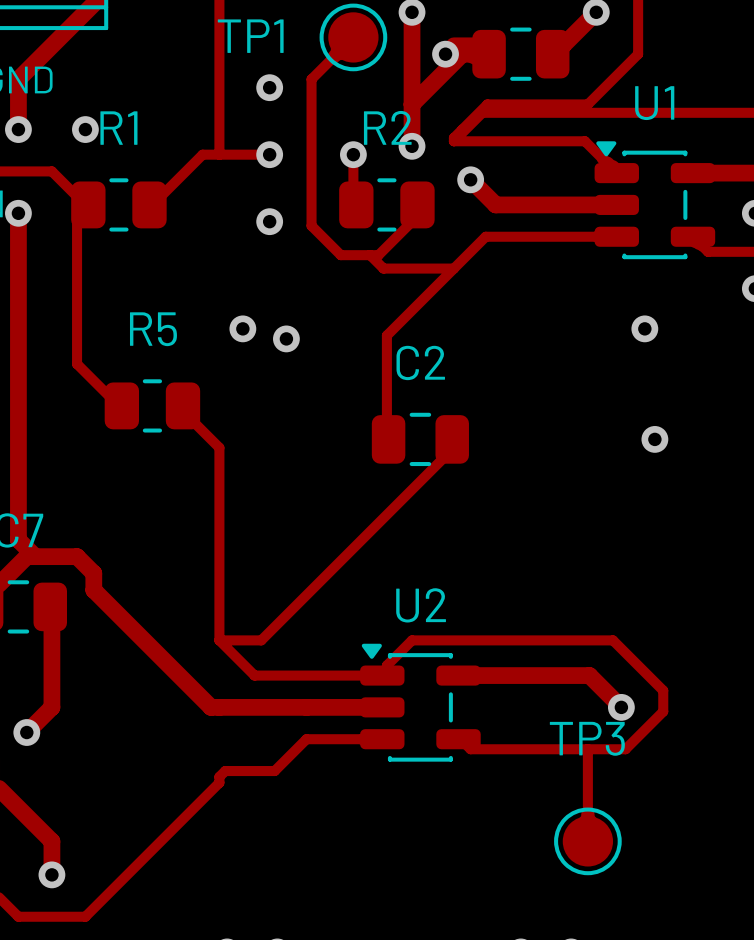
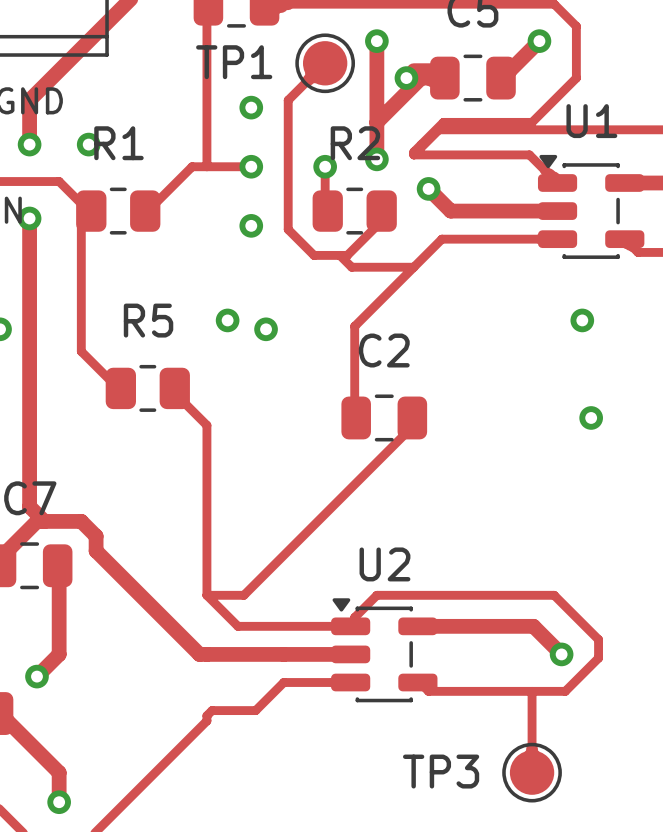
TP3 name position: TP3 (587, 738) -> TP3 (441, 771)

